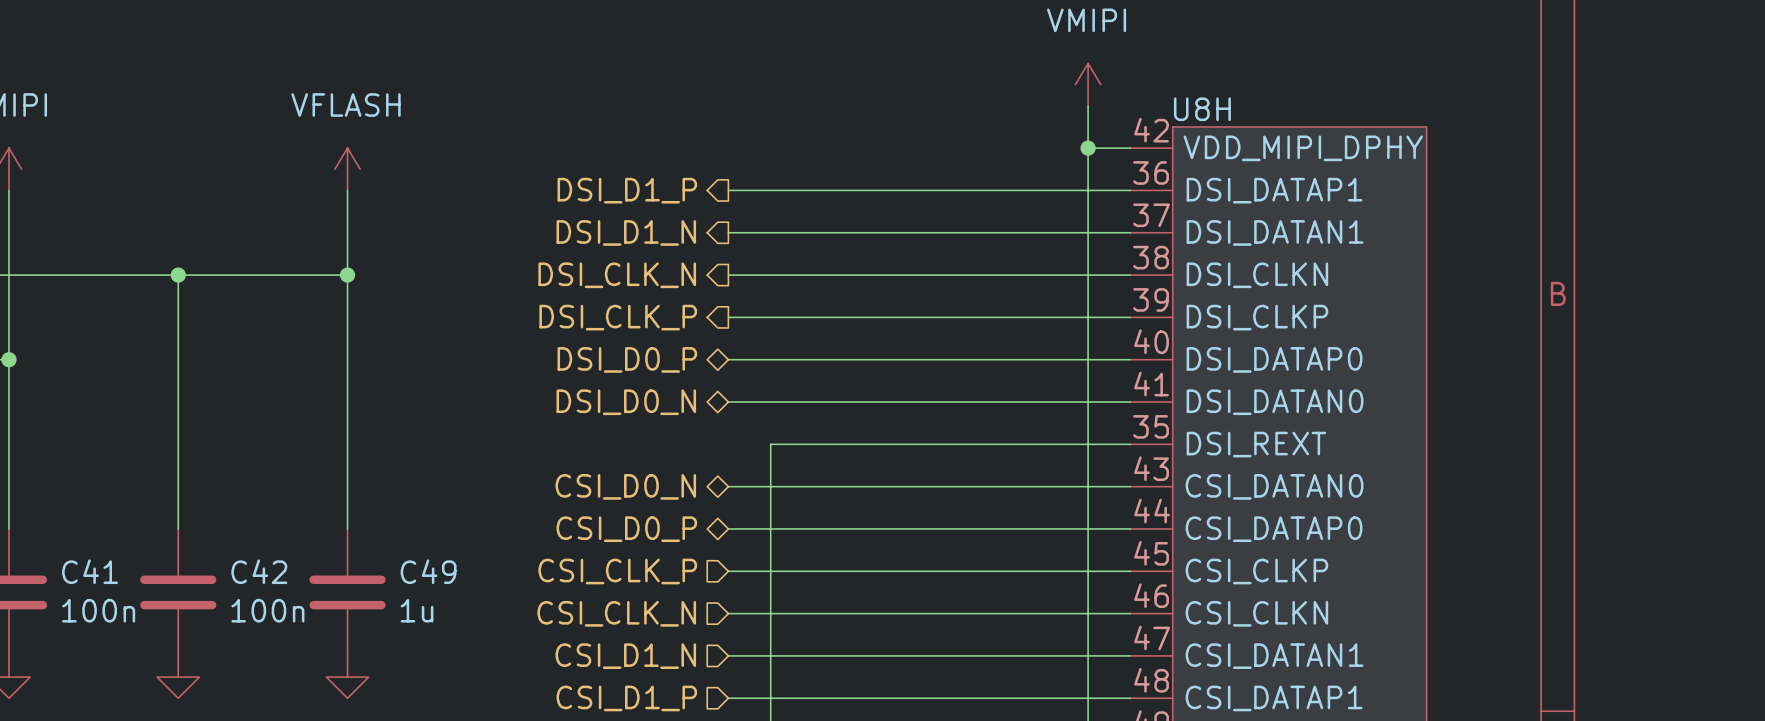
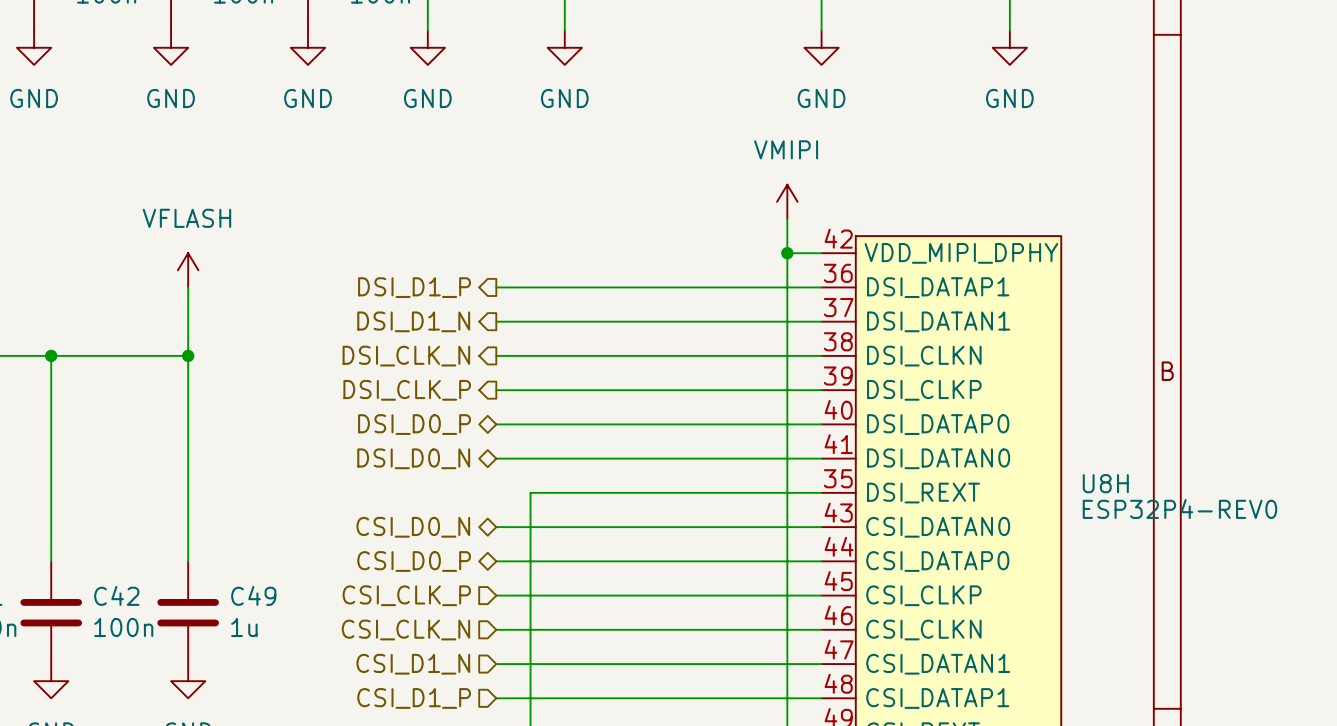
U8H name position: U8H (1202, 109) -> U8H (1105, 483)
U8H value: none -> ESP32P4-REV0 (1179, 508)

